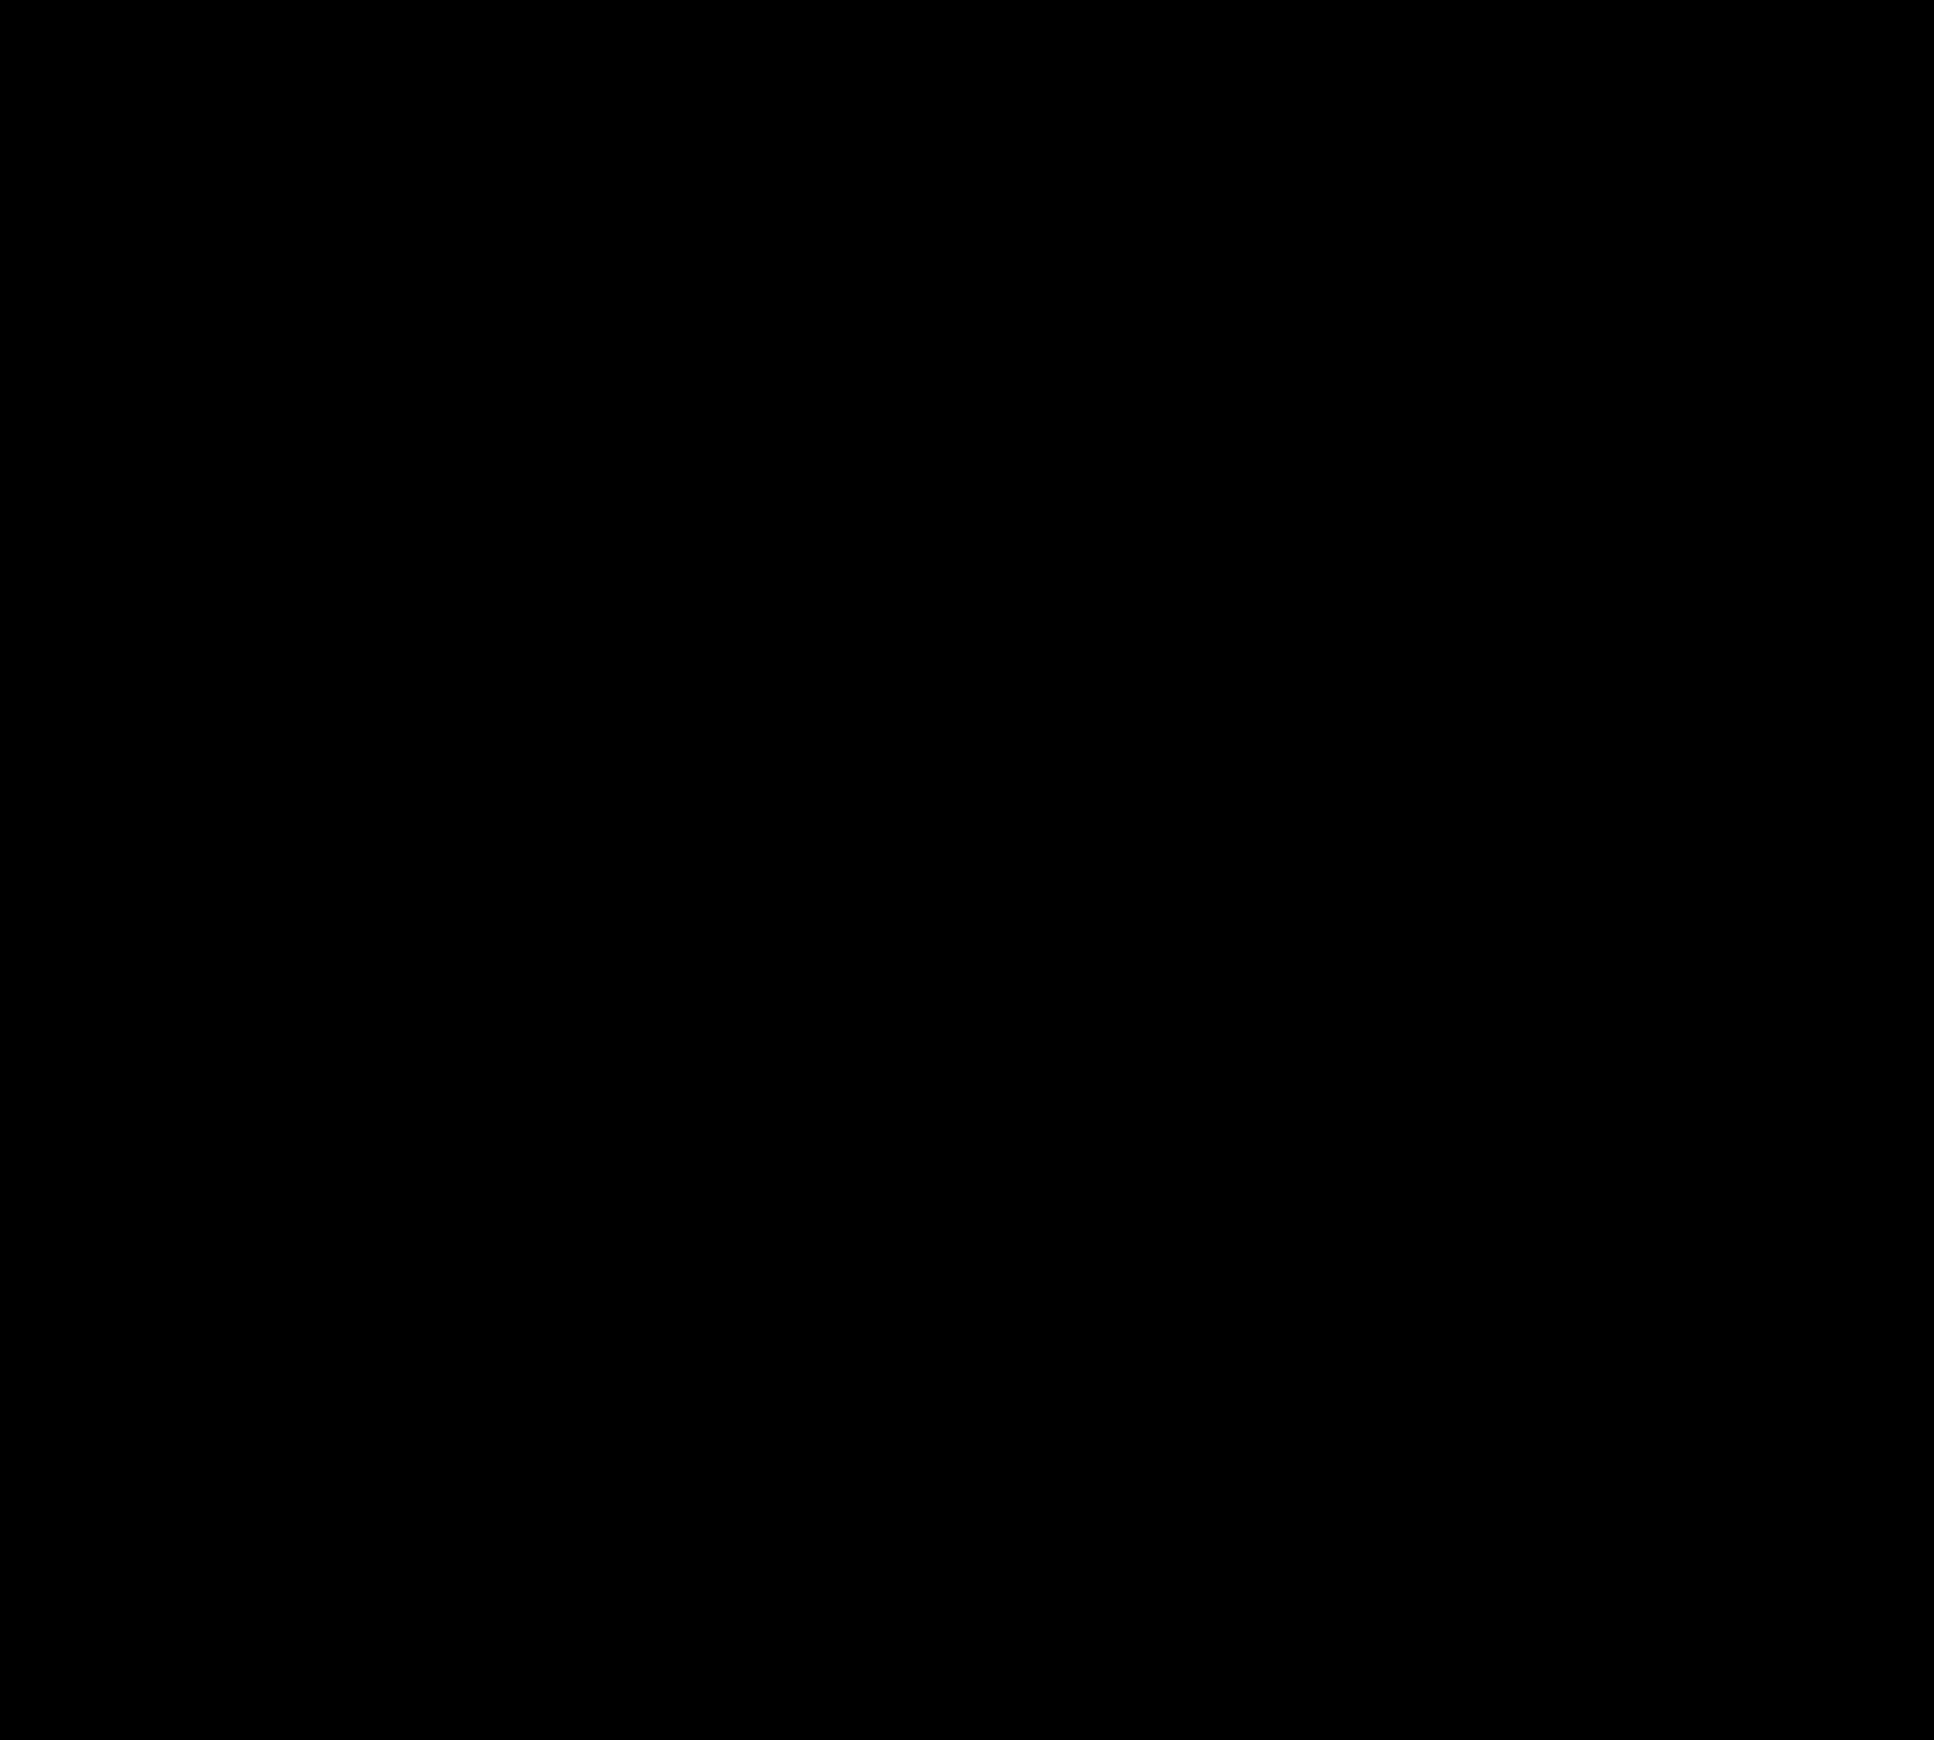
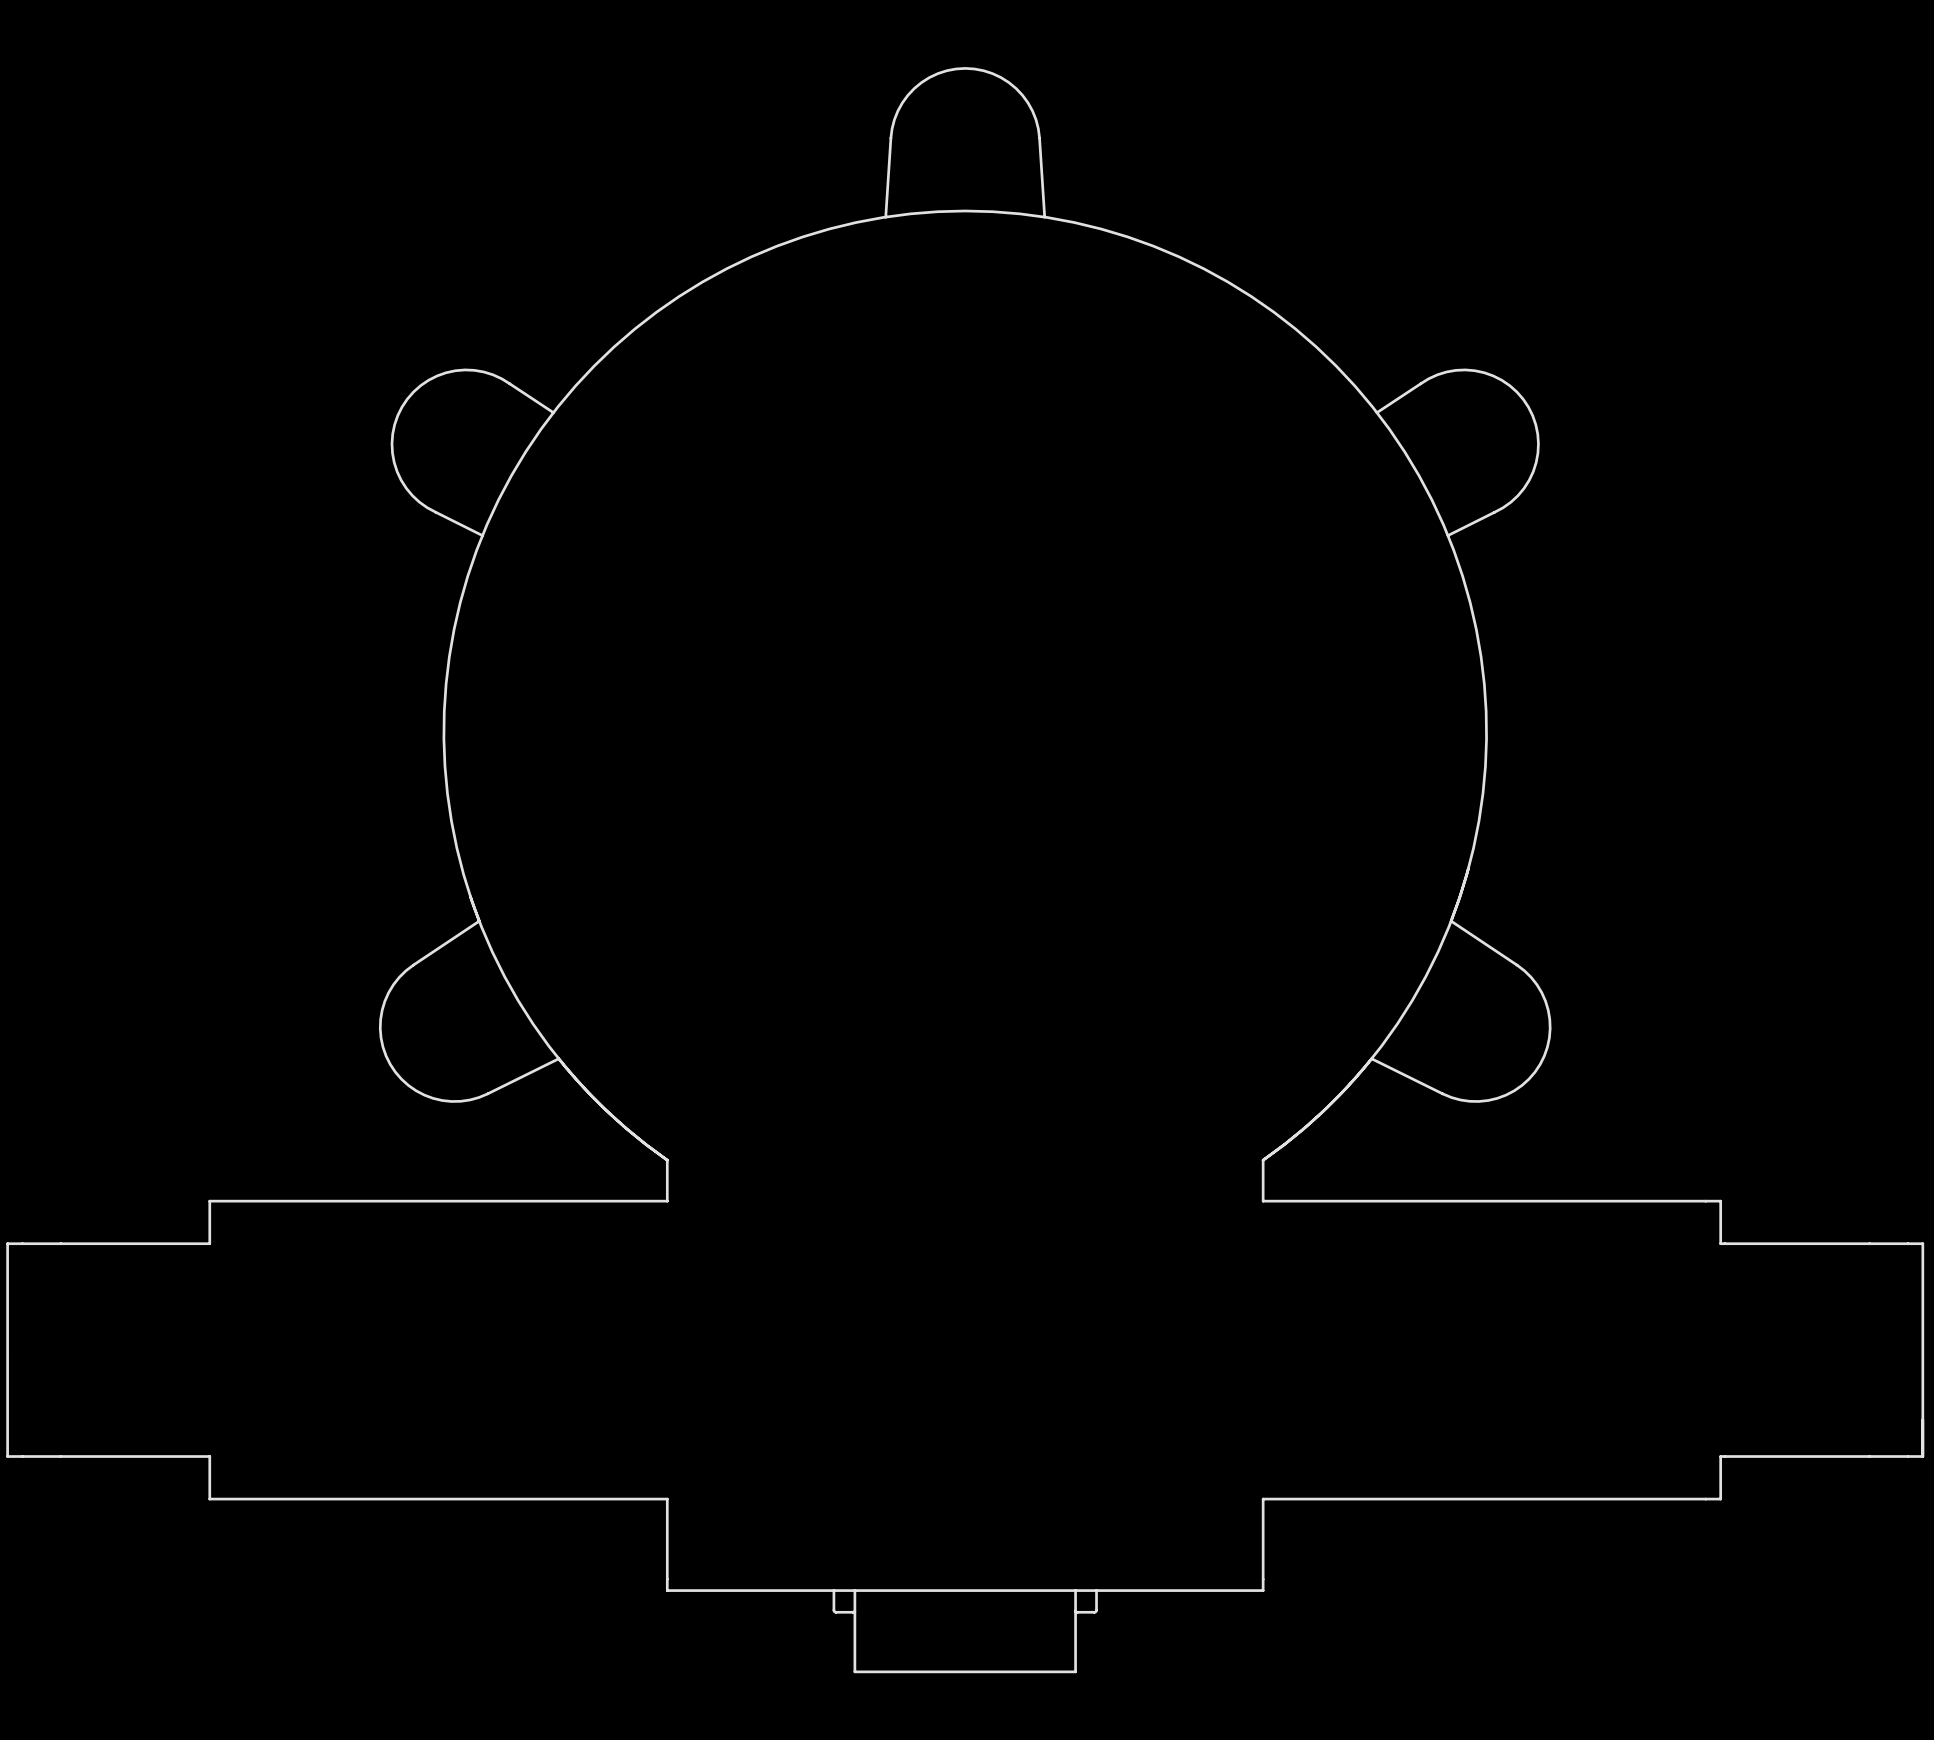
line: none -> (1044, 217) (1039, 138) (1032, 111) (1022, 95) (1001, 77) (983, 70) (965, 68) (946, 70) (929, 77) (914, 88) (897, 111) (890, 138) (885, 217)
line: none -> (553, 412) (501, 378) (483, 371) (465, 369) (446, 372) (428, 380) (413, 391) (401, 407) (394, 424) (391, 443) (394, 462) (401, 480) (412, 495) (427, 507) (482, 535)
line: none -> (1377, 412) (1428, 378) (1446, 371) (1465, 369) (1484, 372) (1501, 380) (1516, 391) (1528, 407) (1535, 424) (1538, 443) (1536, 462) (1529, 480) (1517, 495) (1503, 507) (1448, 535)
line: none -> (1468, 868) (1451, 921) (1517, 965) (1536, 984) (1545, 1001) (1549, 1019) (1547, 1047) (1540, 1064) (1522, 1085) (1506, 1095) (1488, 1100) (1469, 1101) (1442, 1093) (1371, 1058) (1321, 1113) (1263, 1160) (1263, 1201) (1720, 1201) (1720, 1243) (1922, 1243) (1922, 1456) (1720, 1456) (1720, 1499) (1263, 1499) (1263, 1590) (667, 1590) (667, 1499) (209, 1499) (209, 1456) (7, 1456) (7, 1243) (209, 1243) (209, 1201) (667, 1201) (667, 1160)
line: none -> (470, 896) (479, 921) (405, 970) (393, 984) (384, 1001) (380, 1019) (381, 1037) (386, 1055) (395, 1072) (408, 1085) (424, 1095) (442, 1100) (460, 1101) (487, 1093) (558, 1058) (609, 1113) (667, 1160)
line: none -> (1263, 1160) (1326, 1107) (1381, 1046) (1425, 976) (1458, 900) (1478, 821) (1486, 738) (1481, 656) (1462, 576) (1431, 499) (1389, 429) (1336, 366) (1273, 312) (1203, 268) (1127, 236) (1047, 217) (965, 210) (883, 217) (802, 236) (726, 268) (656, 312) (594, 366) (541, 429) (498, 499) (467, 576) (449, 656) (443, 738) (451, 821) (471, 900) (504, 976) (548, 1046) (603, 1107) (667, 1160)
line: none -> (833, 1590) (834, 1611) (854, 1611)
line: none -> (1075, 1590) (1075, 1671) (854, 1671) (854, 1590)
line: none -> (1096, 1590) (1095, 1611) (1075, 1611)

